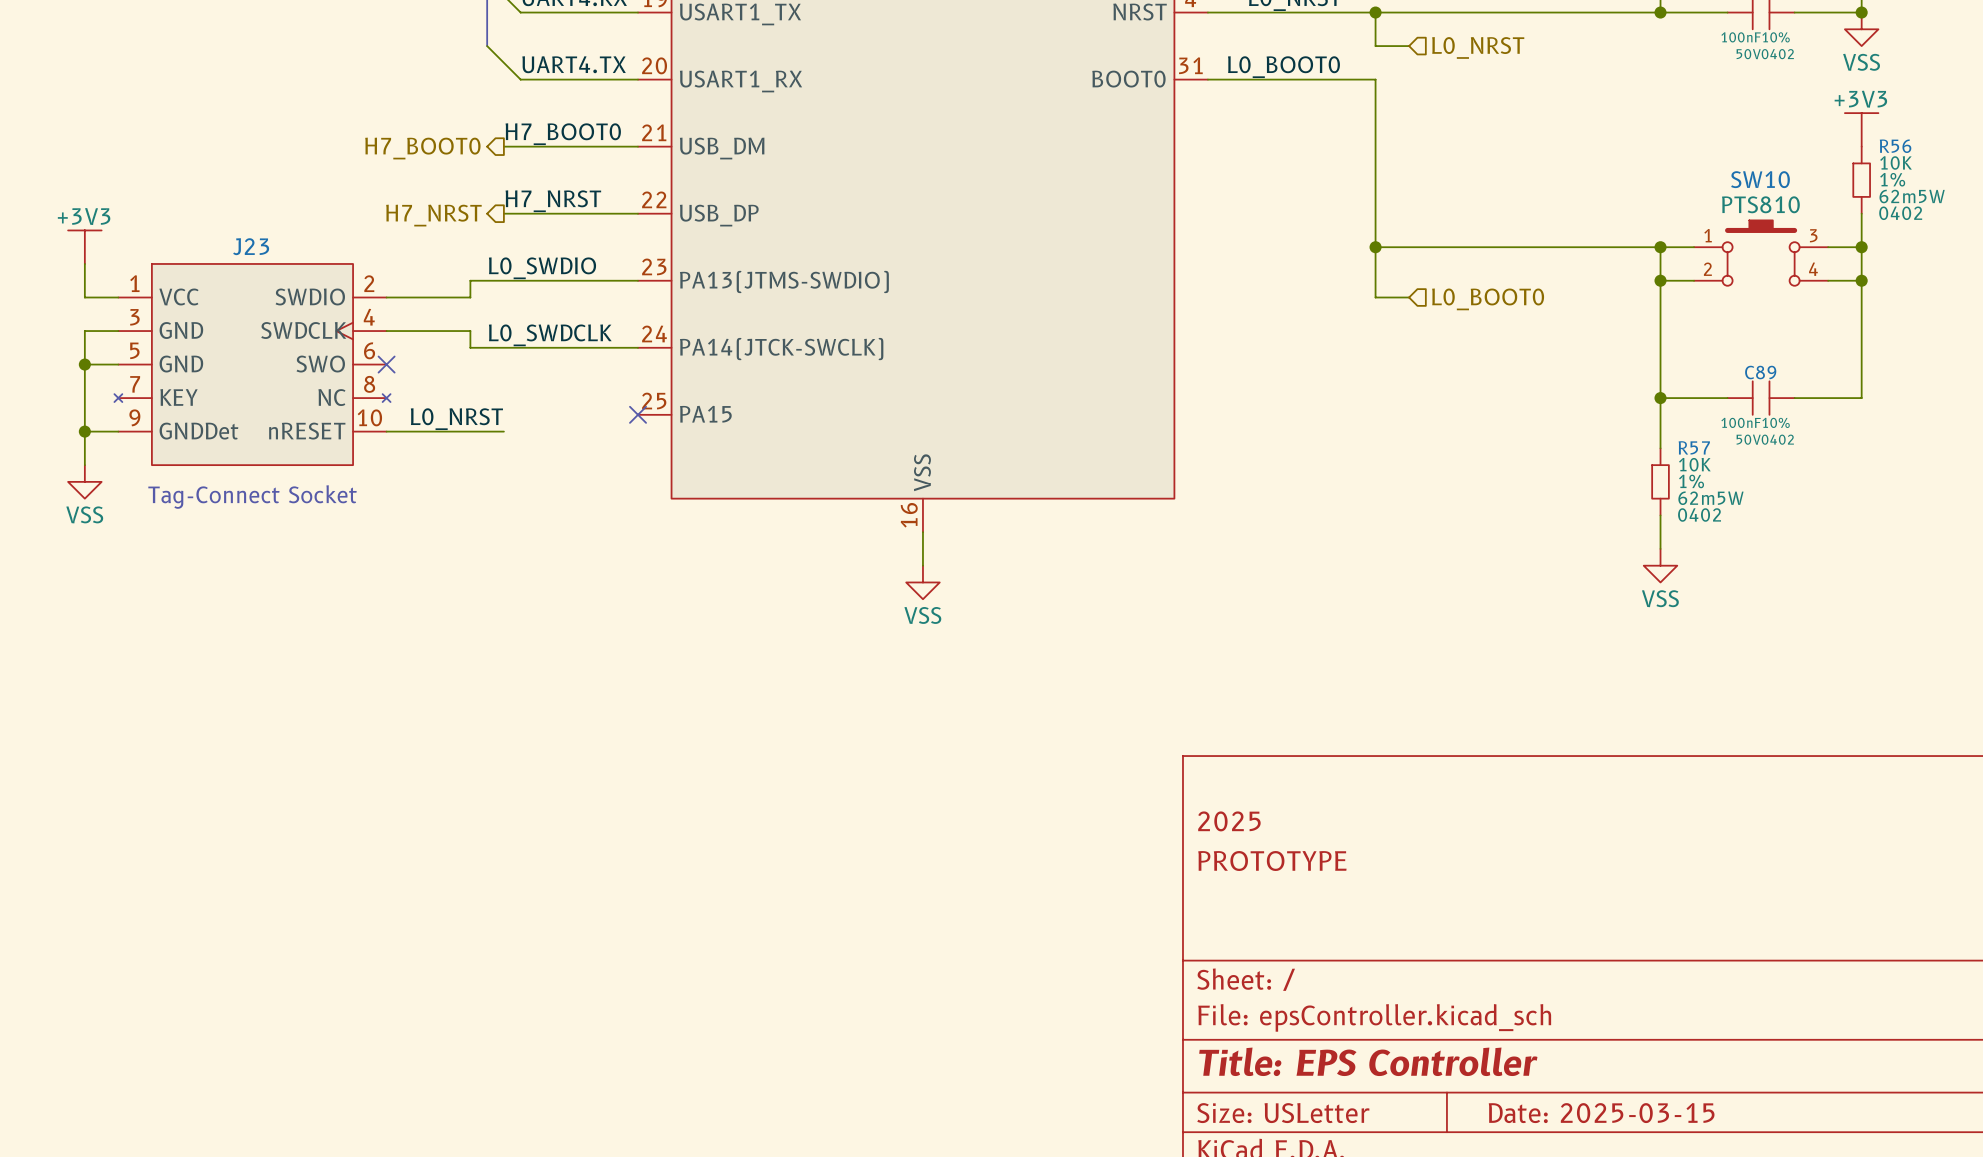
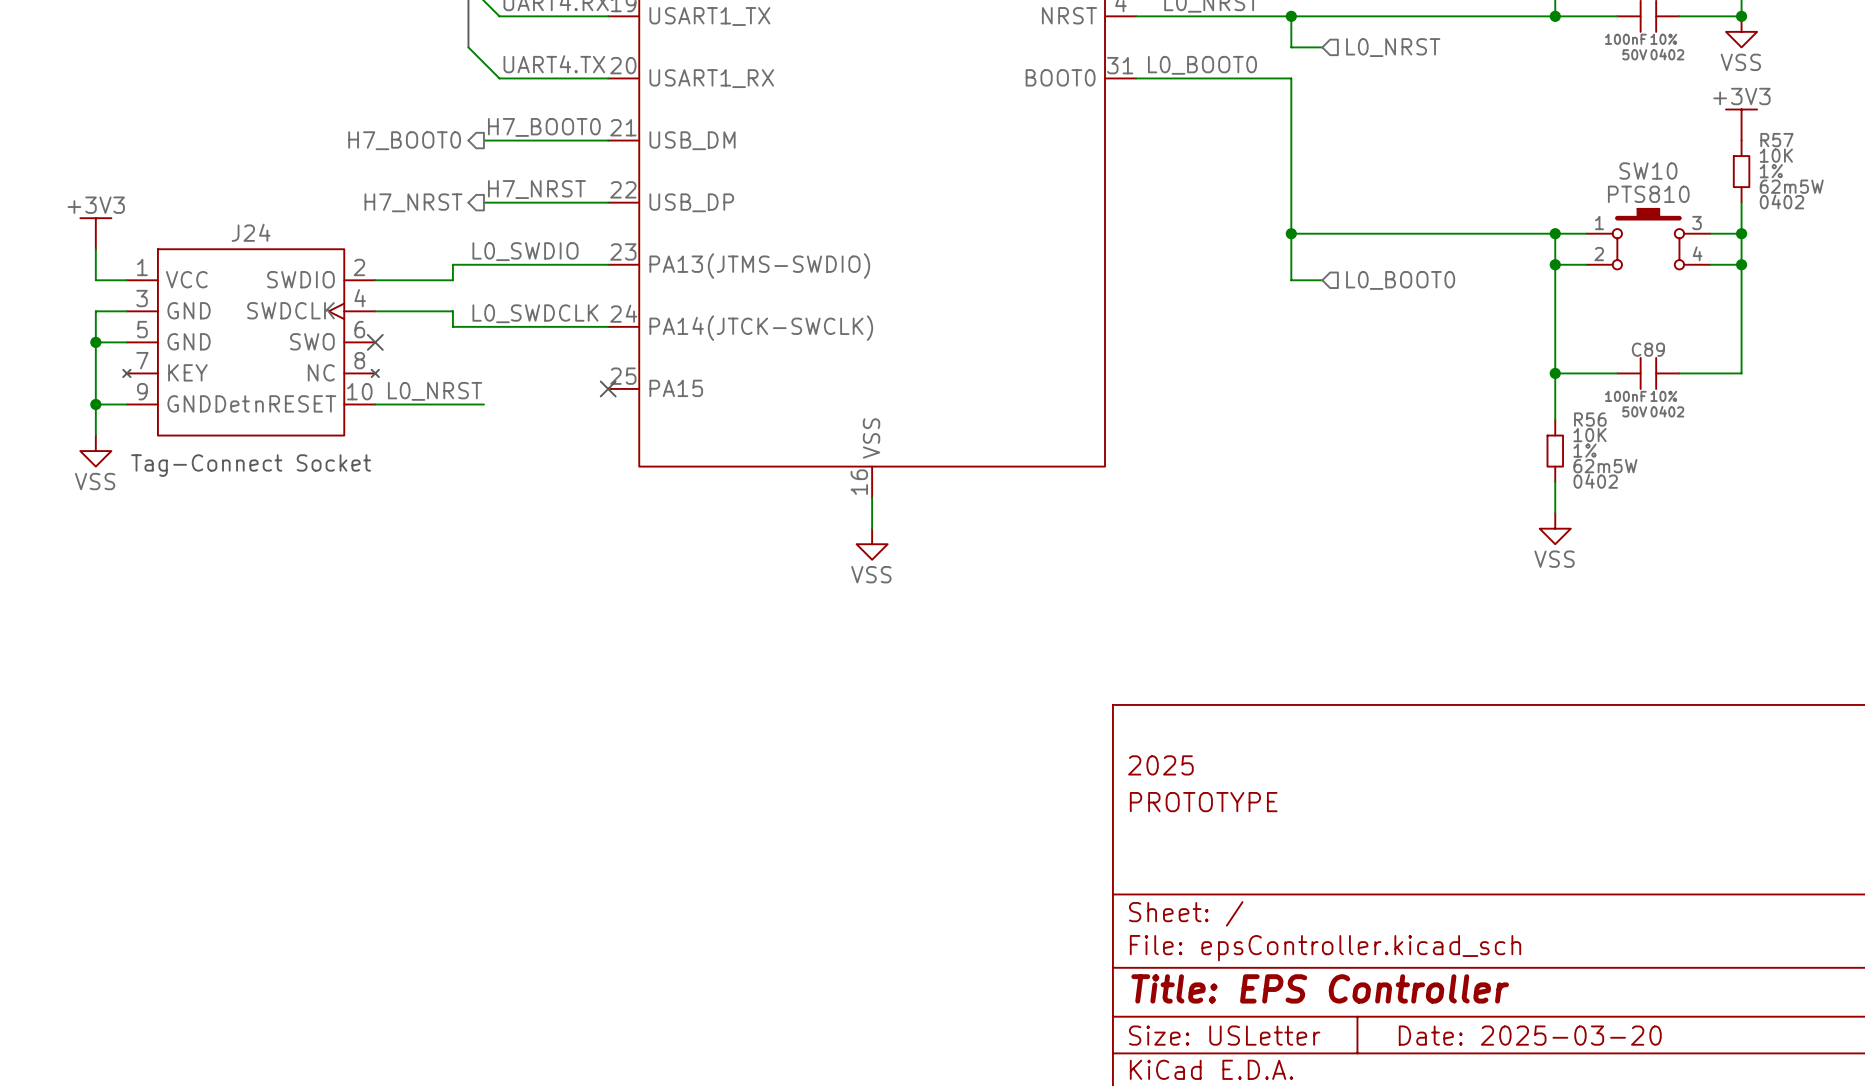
R56 name: R56 (1895, 146) -> R57 (1776, 140)
J23 name: J23 (251, 246) -> J24 (251, 232)
R57 name: R57 (1694, 447) -> R56 (1590, 419)
title block: Date: 2025-03-15 (1601, 1113) -> Date: 2025-03-20 (1530, 1035)

